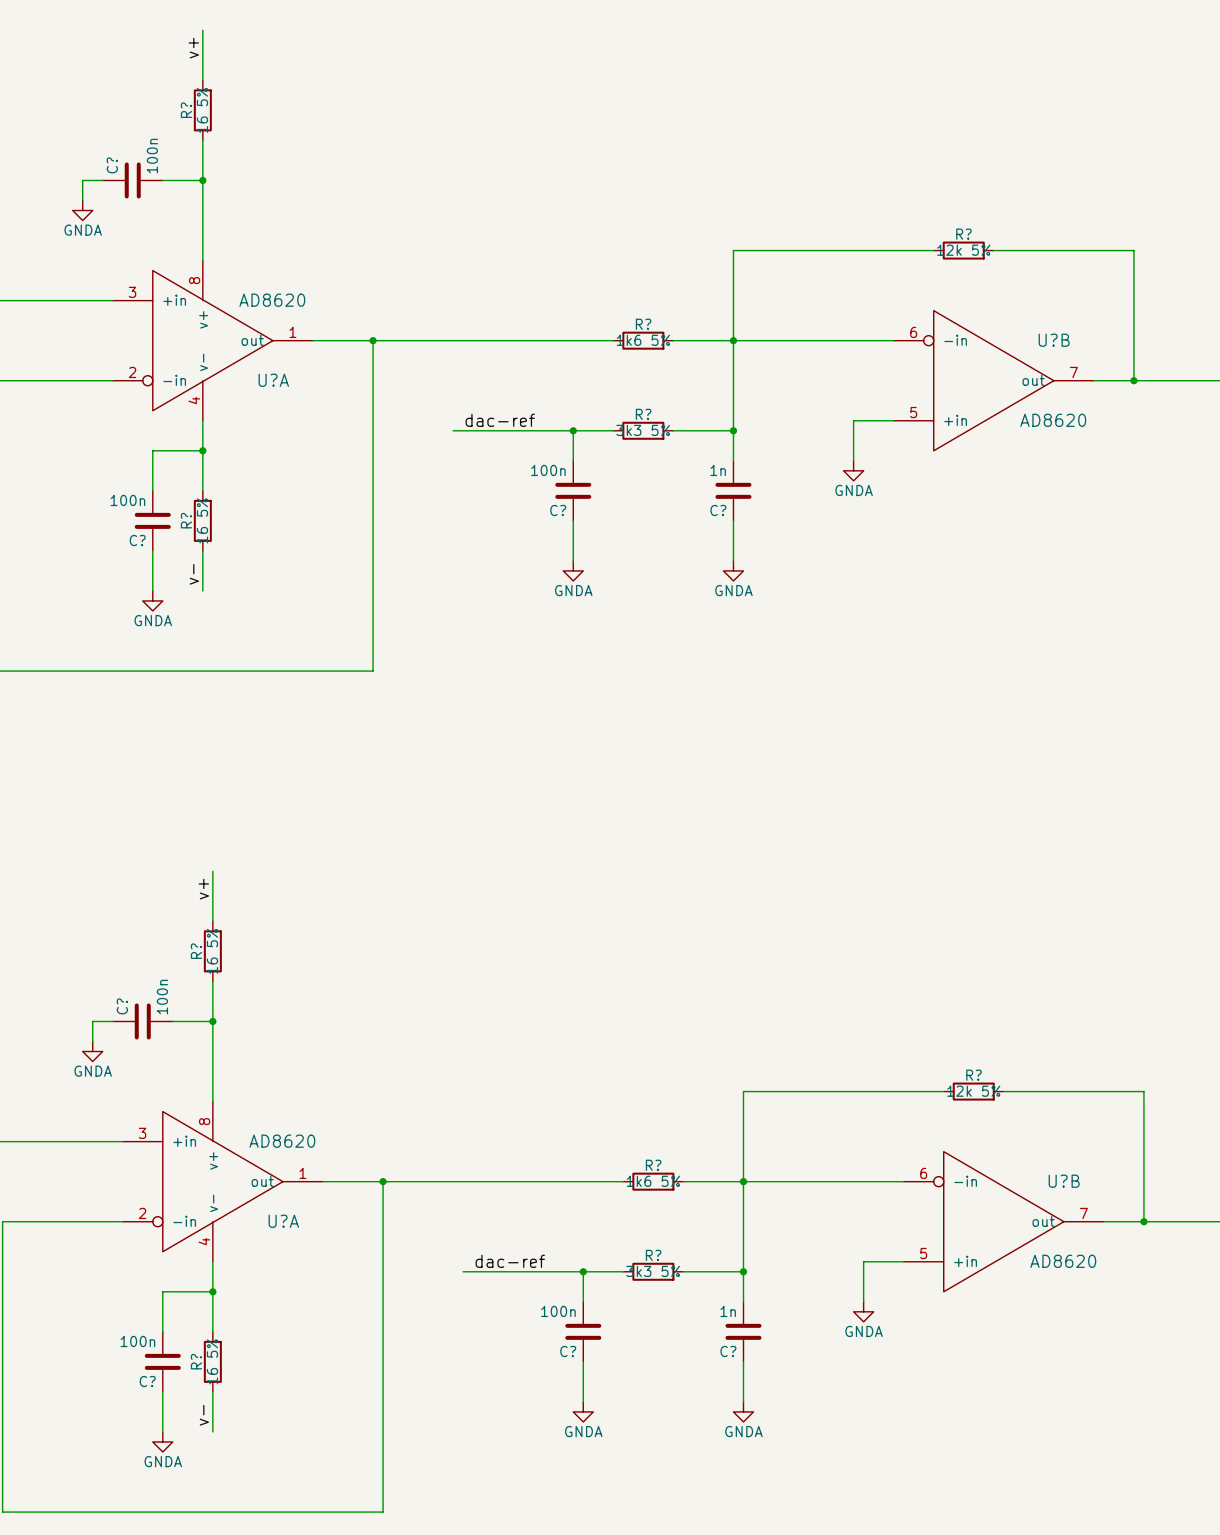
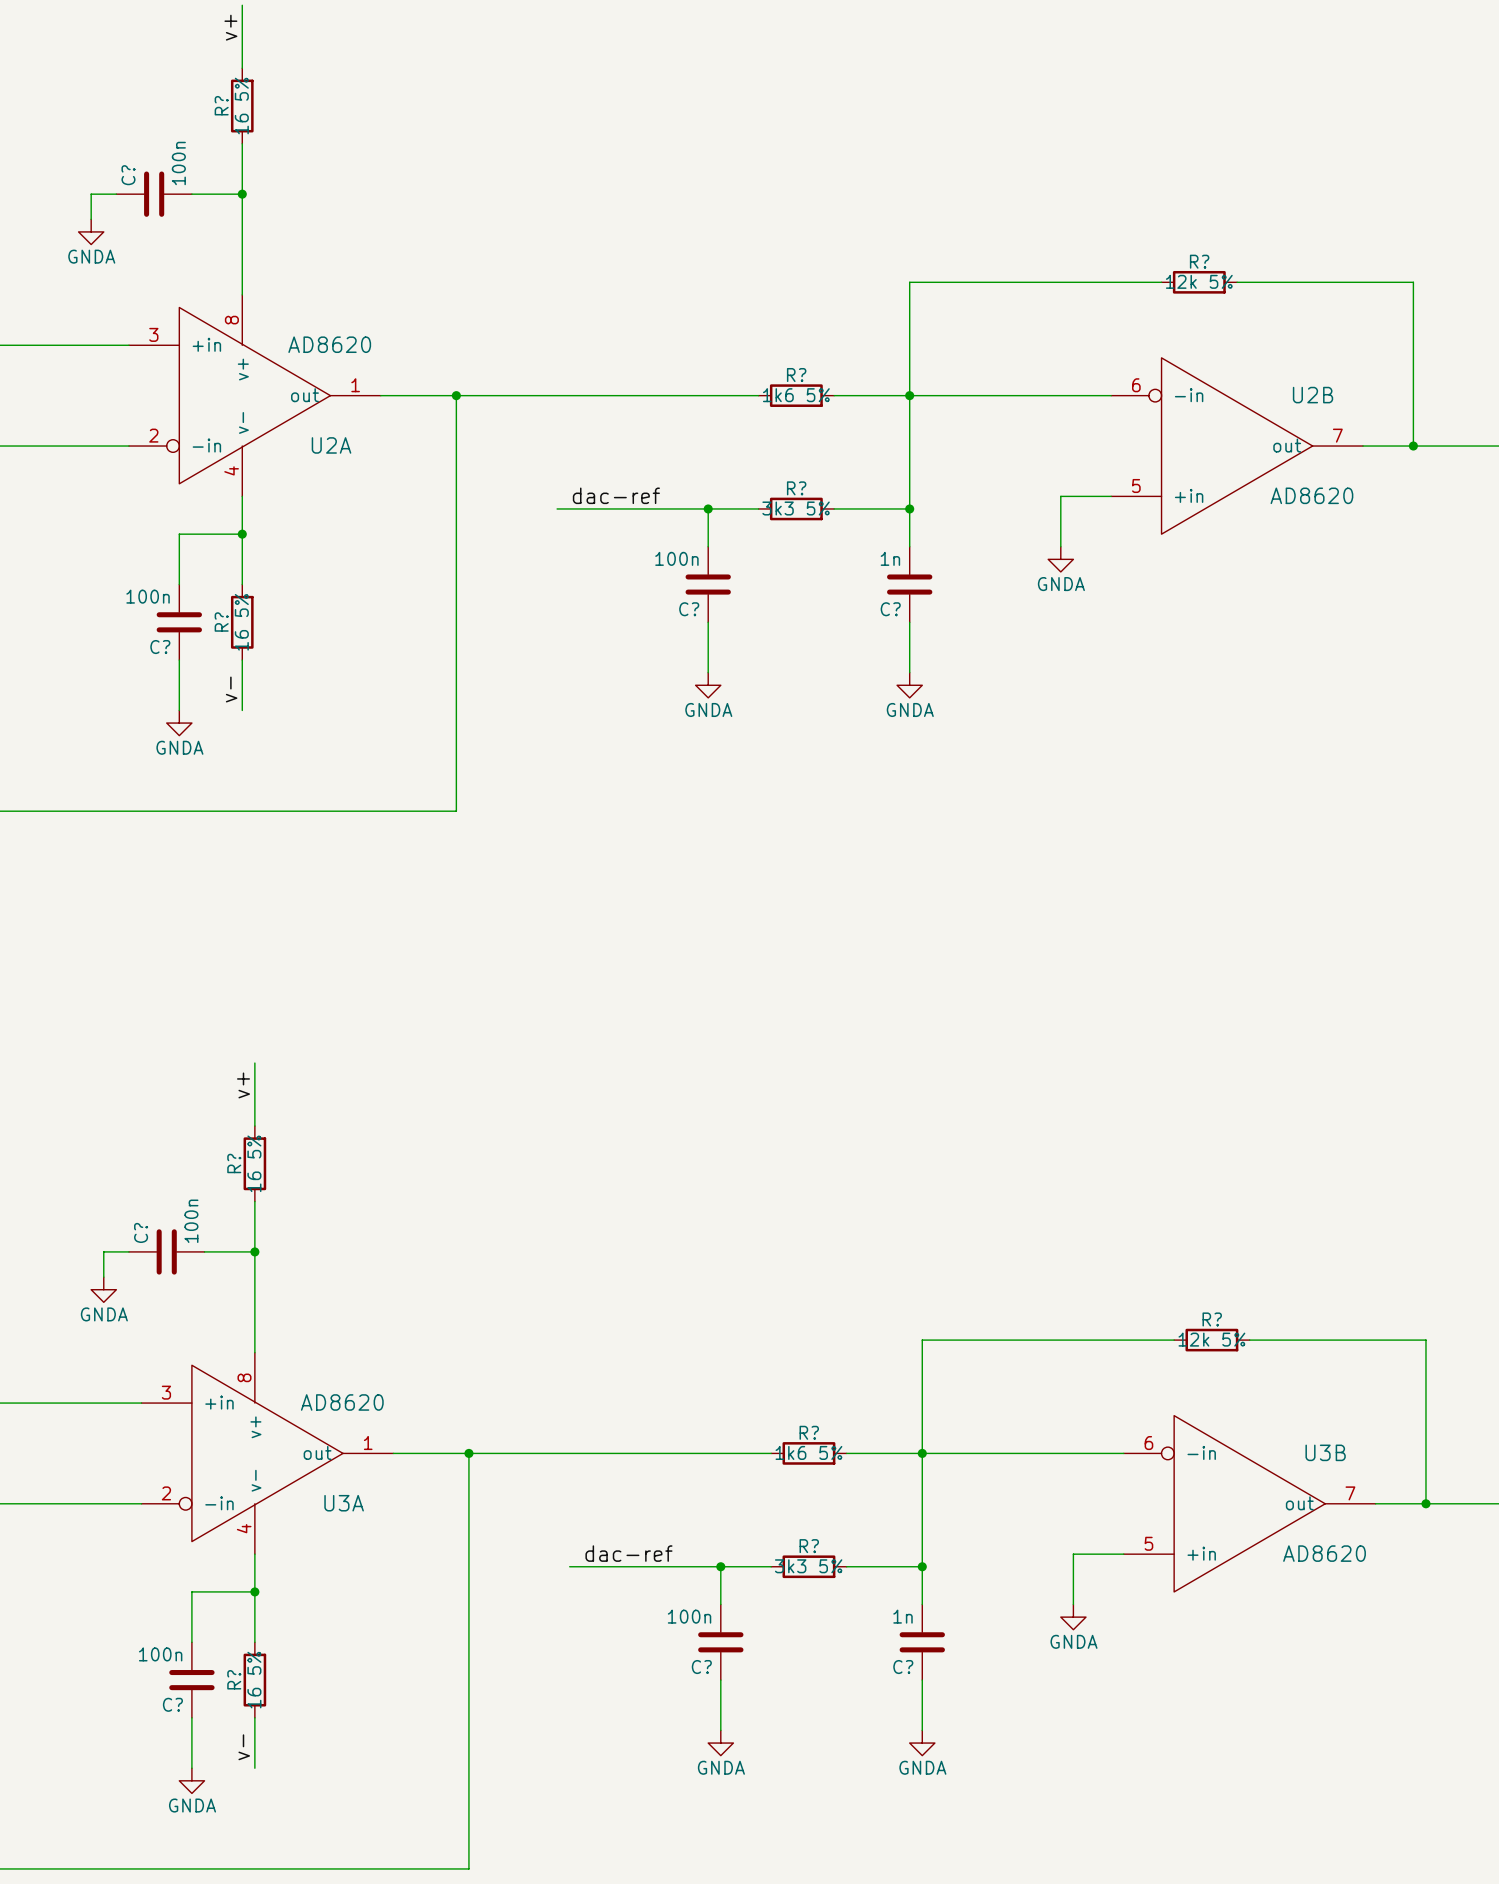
U?B name: U?B (1054, 340) -> U2B (1313, 395)
U?A name: U?A (273, 380) -> U2A (331, 445)
U?B name: U?B (1064, 1181) -> U3B (1325, 1452)
U?A name: U?A (283, 1221) -> U3A (344, 1503)

